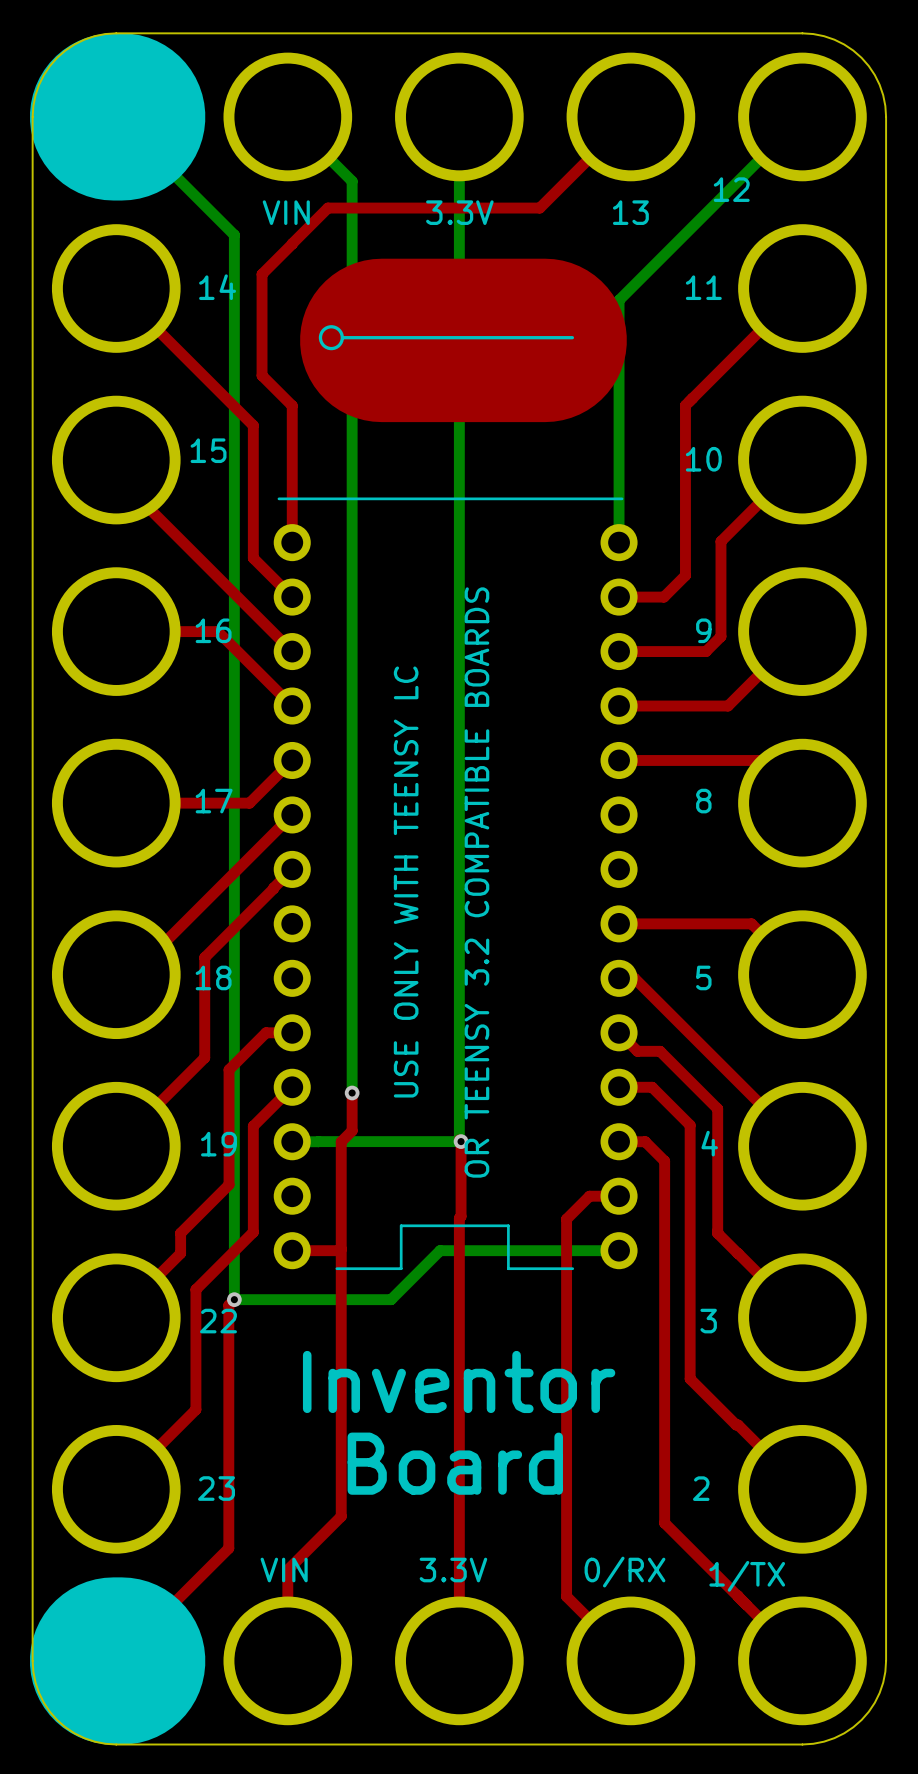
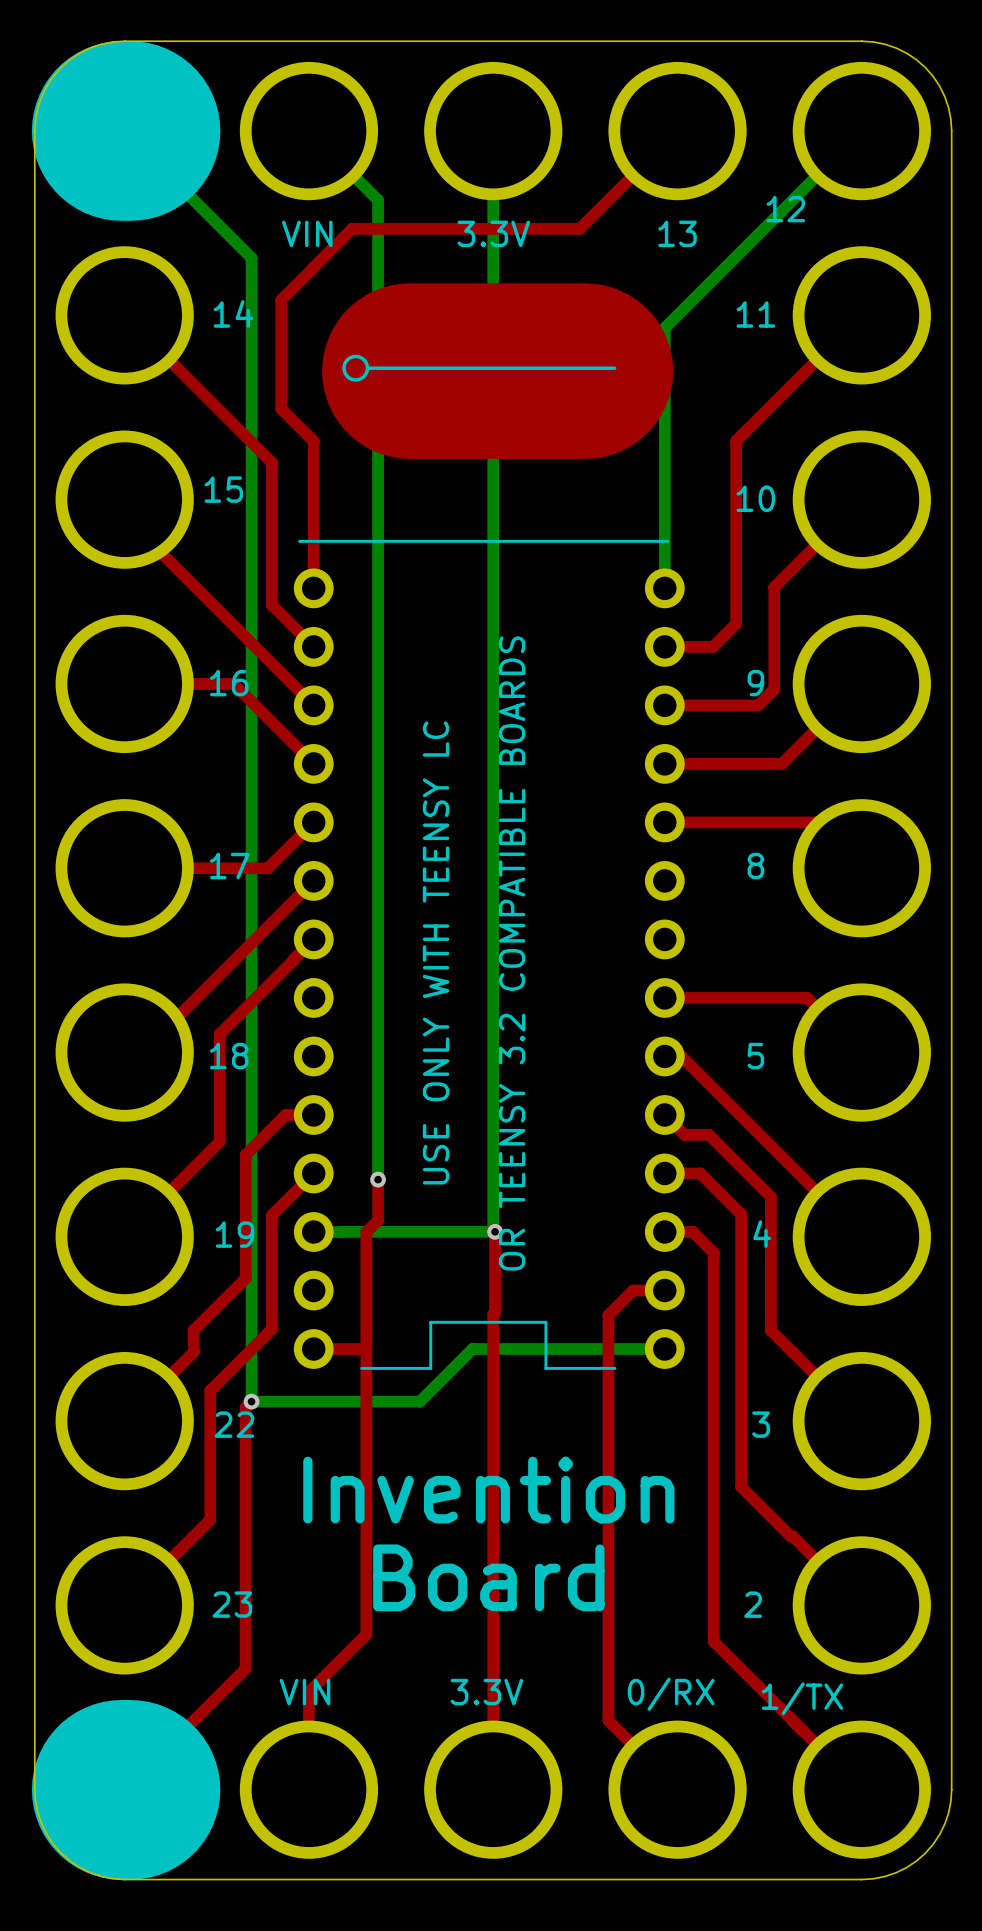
text: Inventor (459, 1381) -> Invention (488, 1490)

